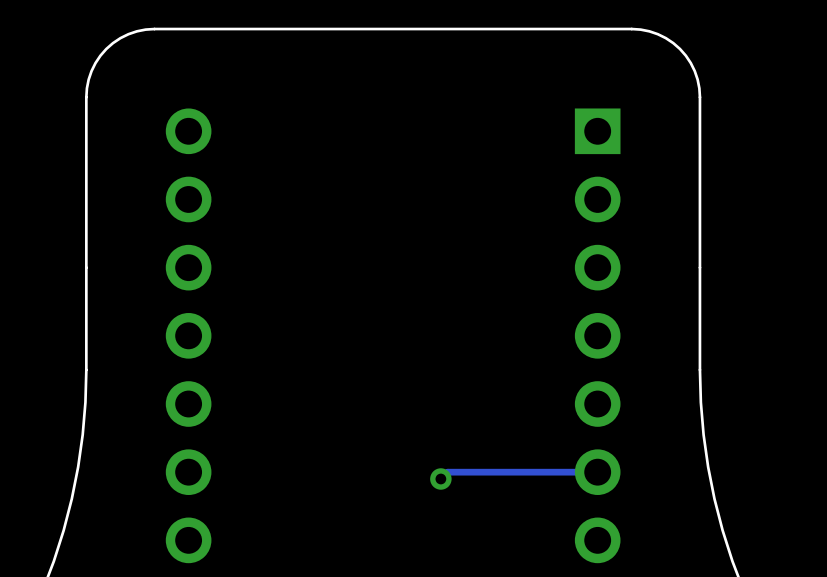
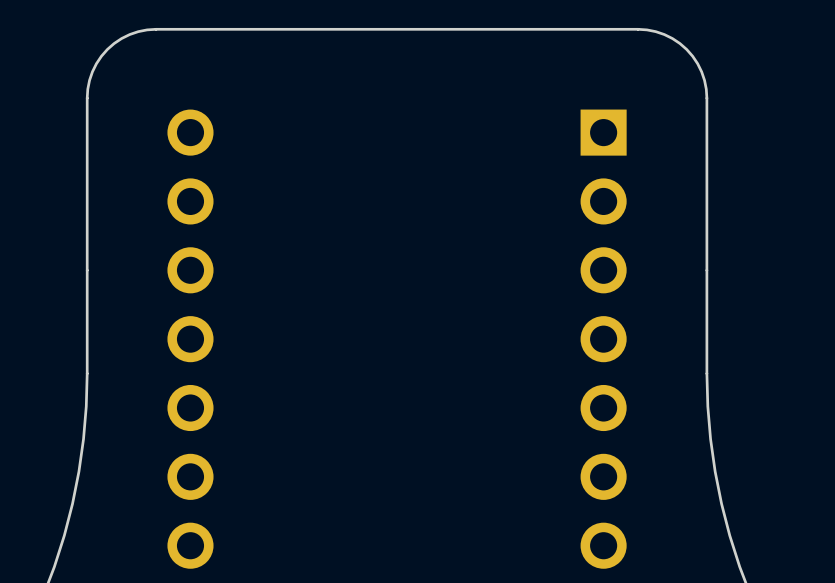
track: (597, 472) (447, 472) (440, 479) -> none
via: (440, 479) -> none

